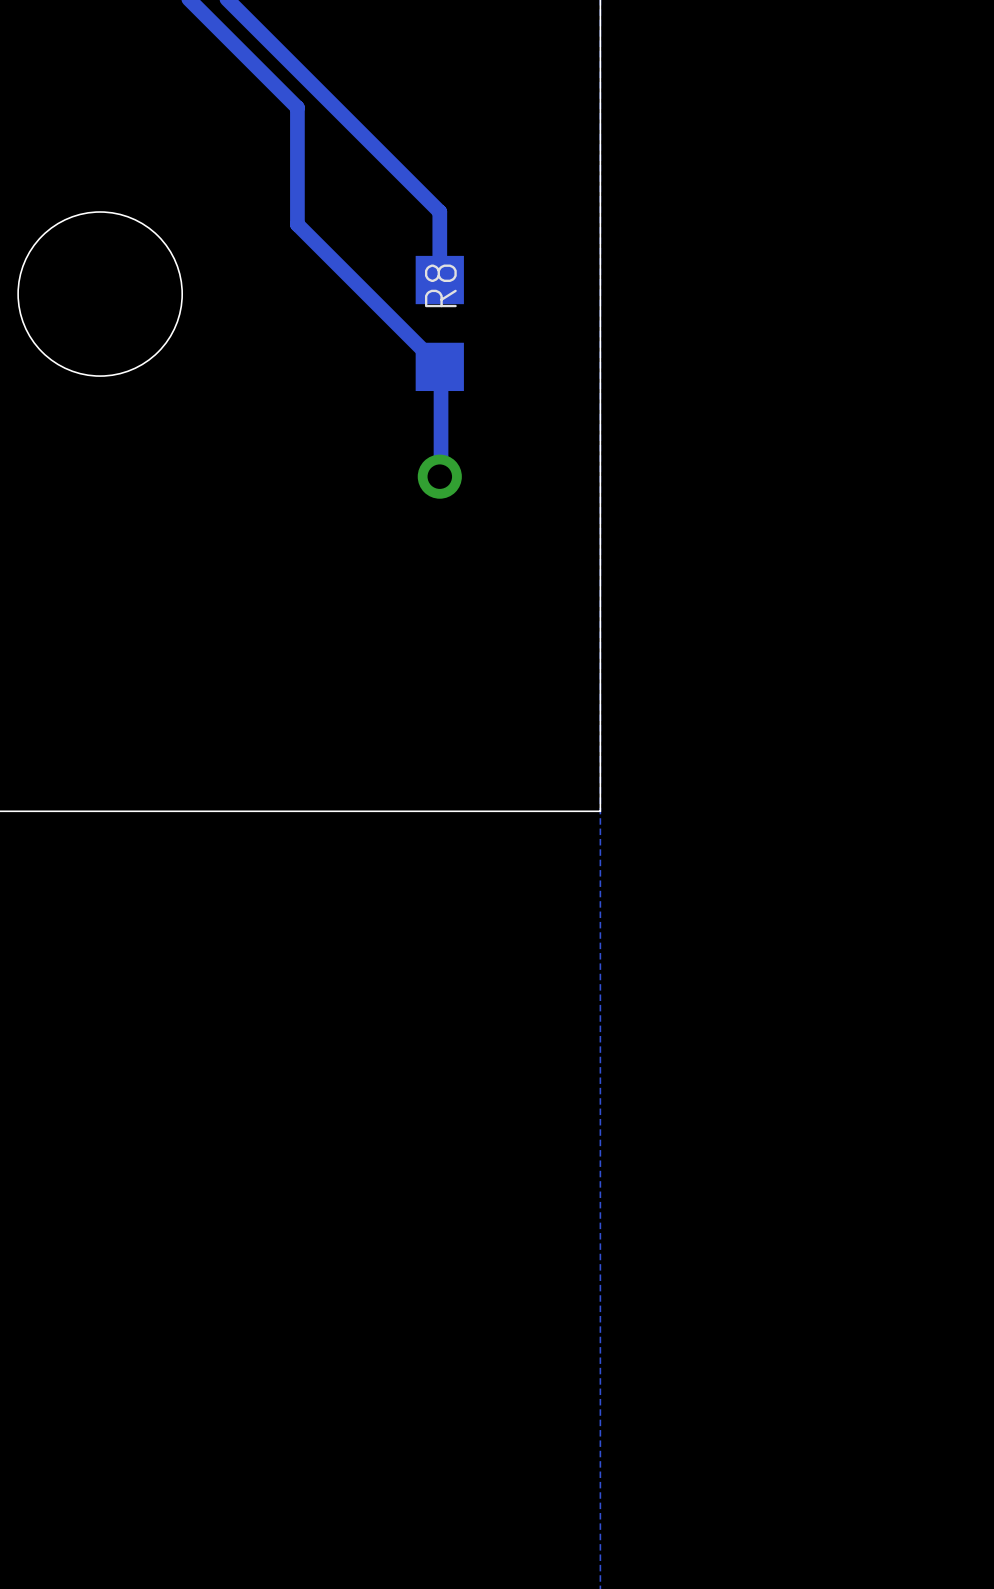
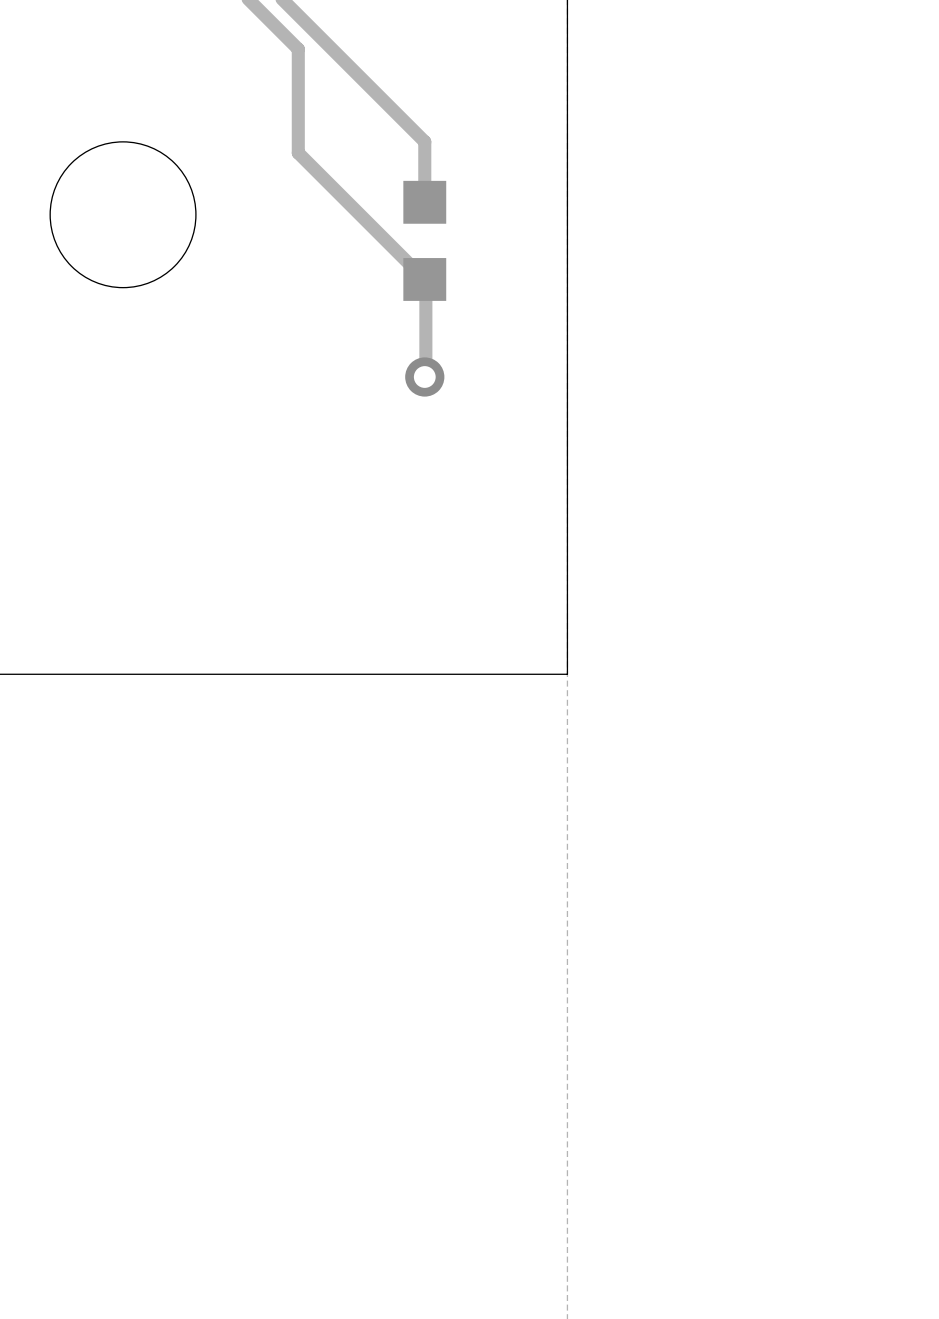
R8 name: R8 (440, 285) -> none

